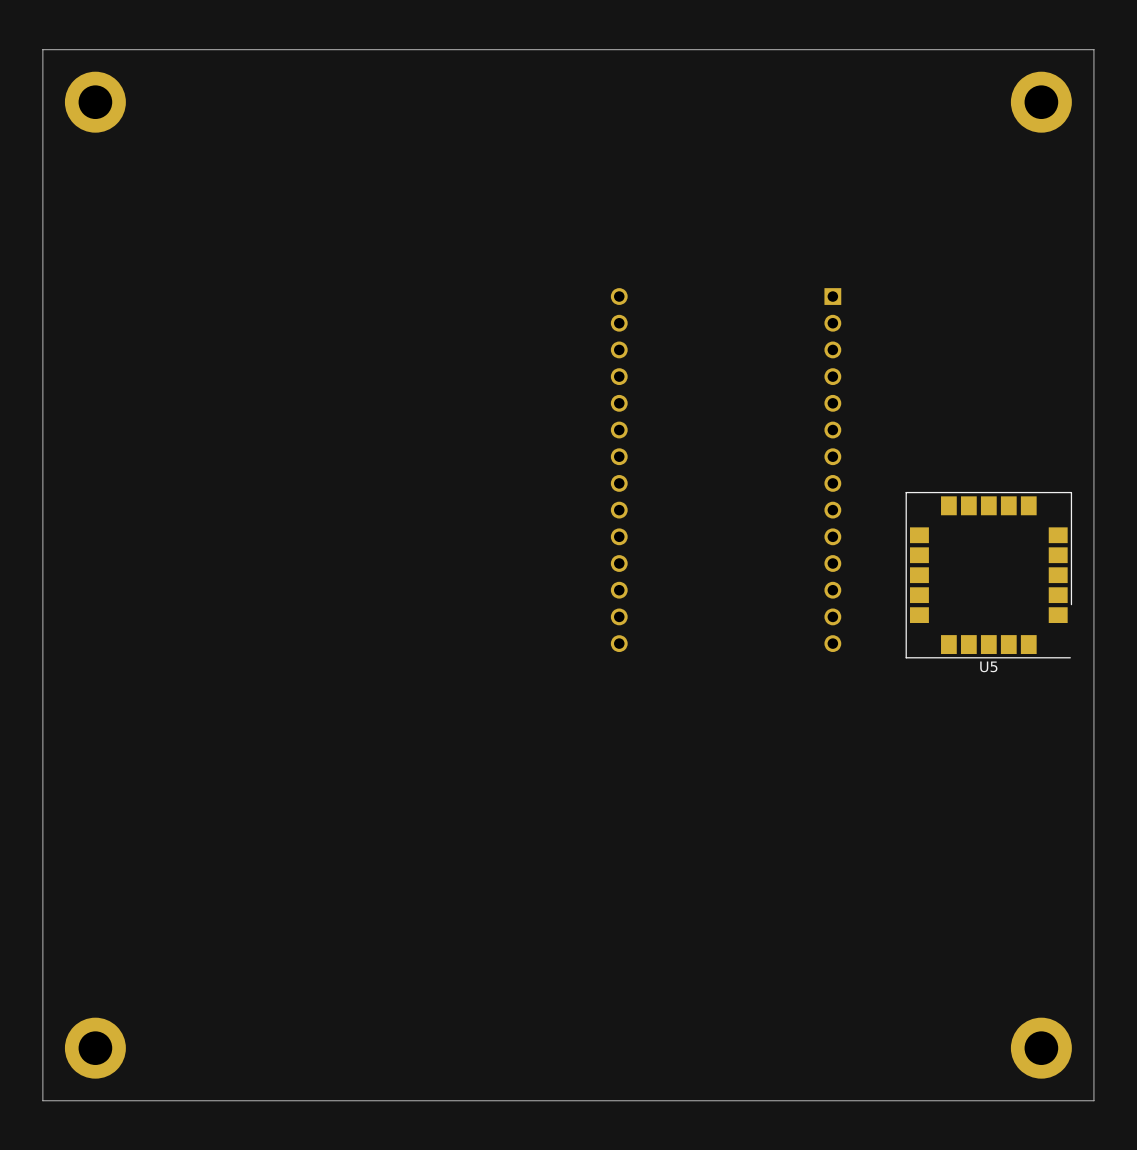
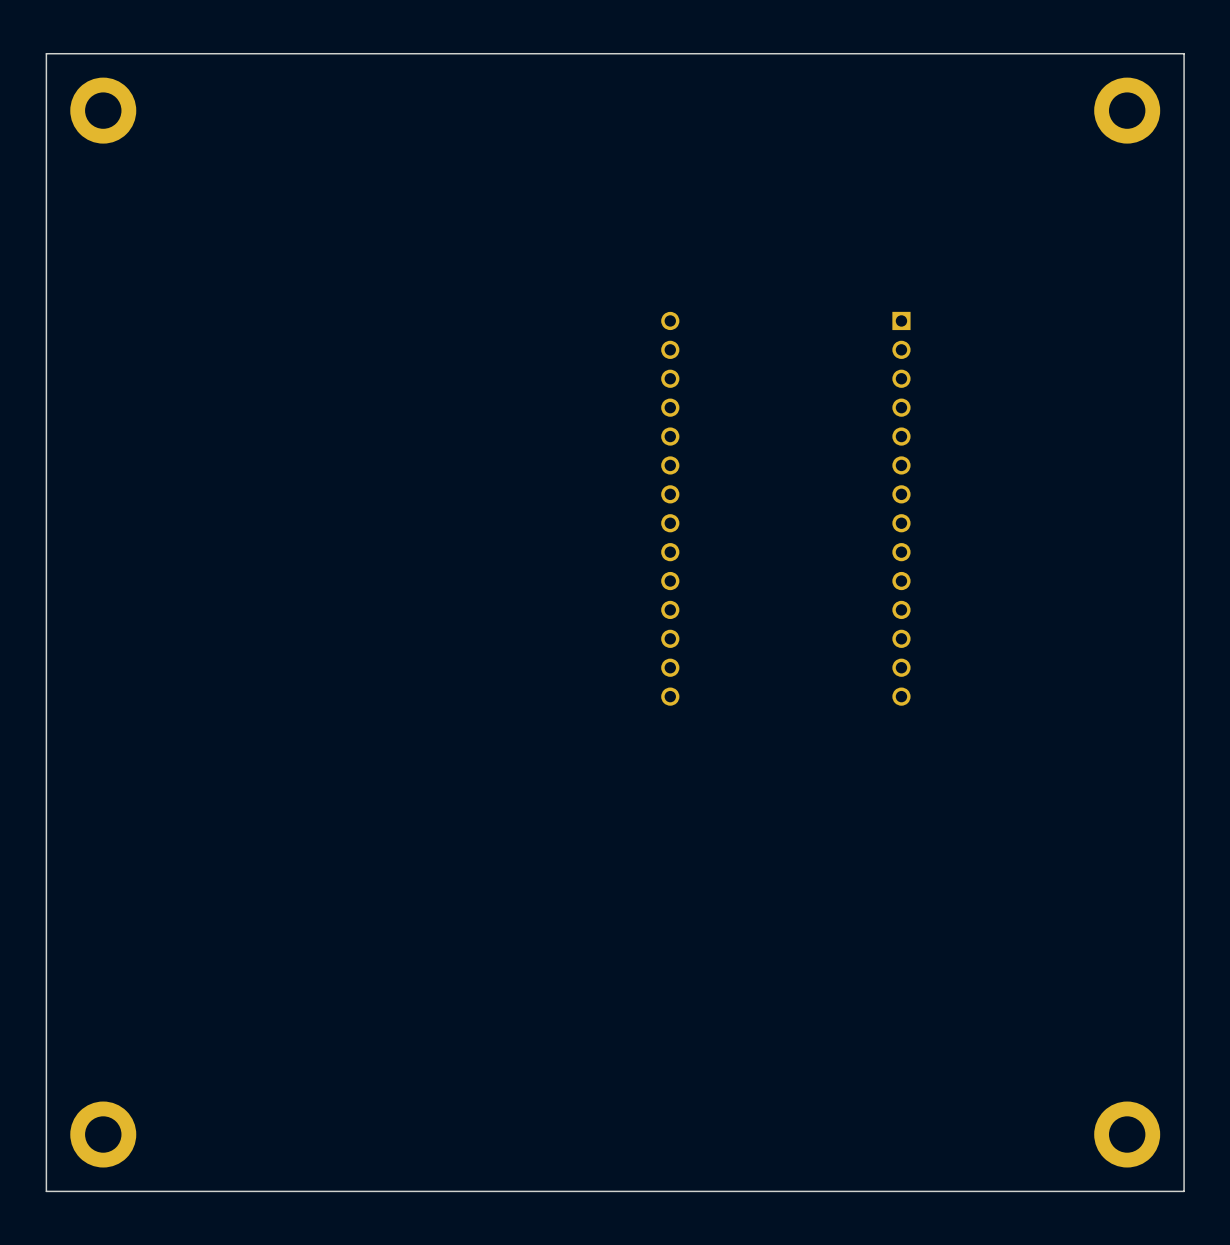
U5: (988, 575) -> none

